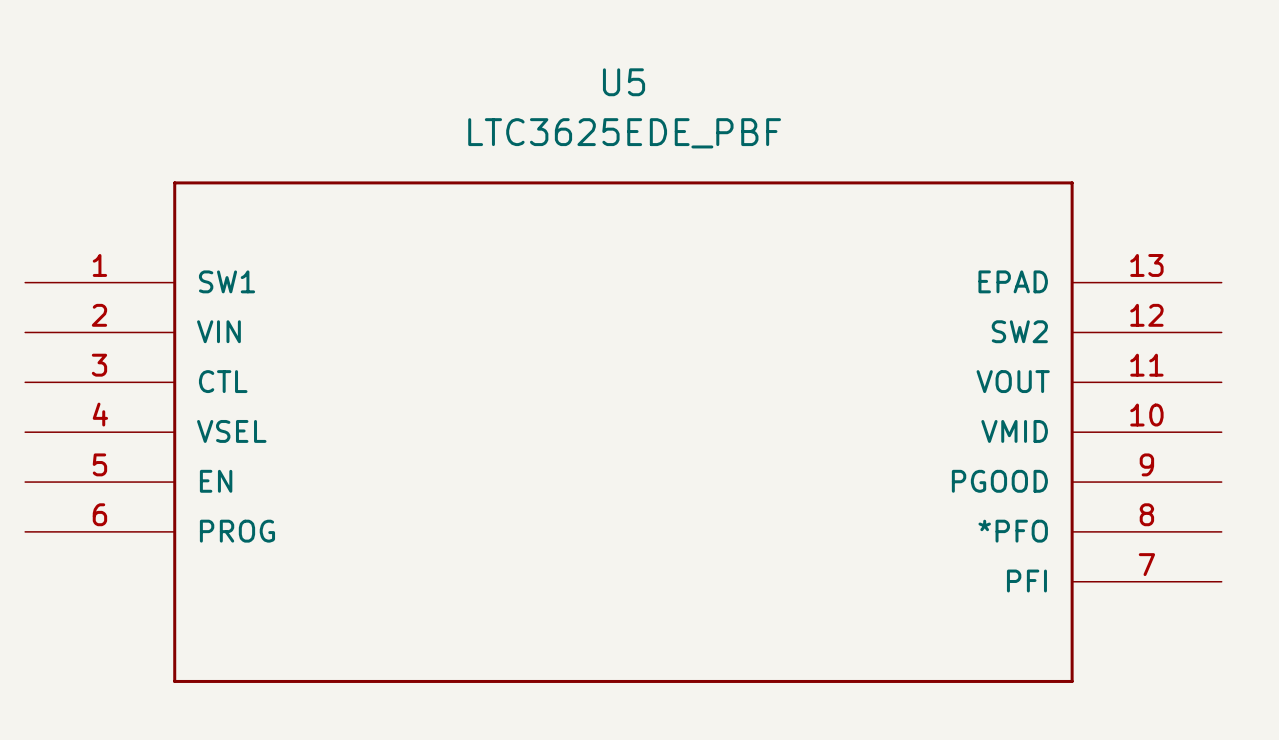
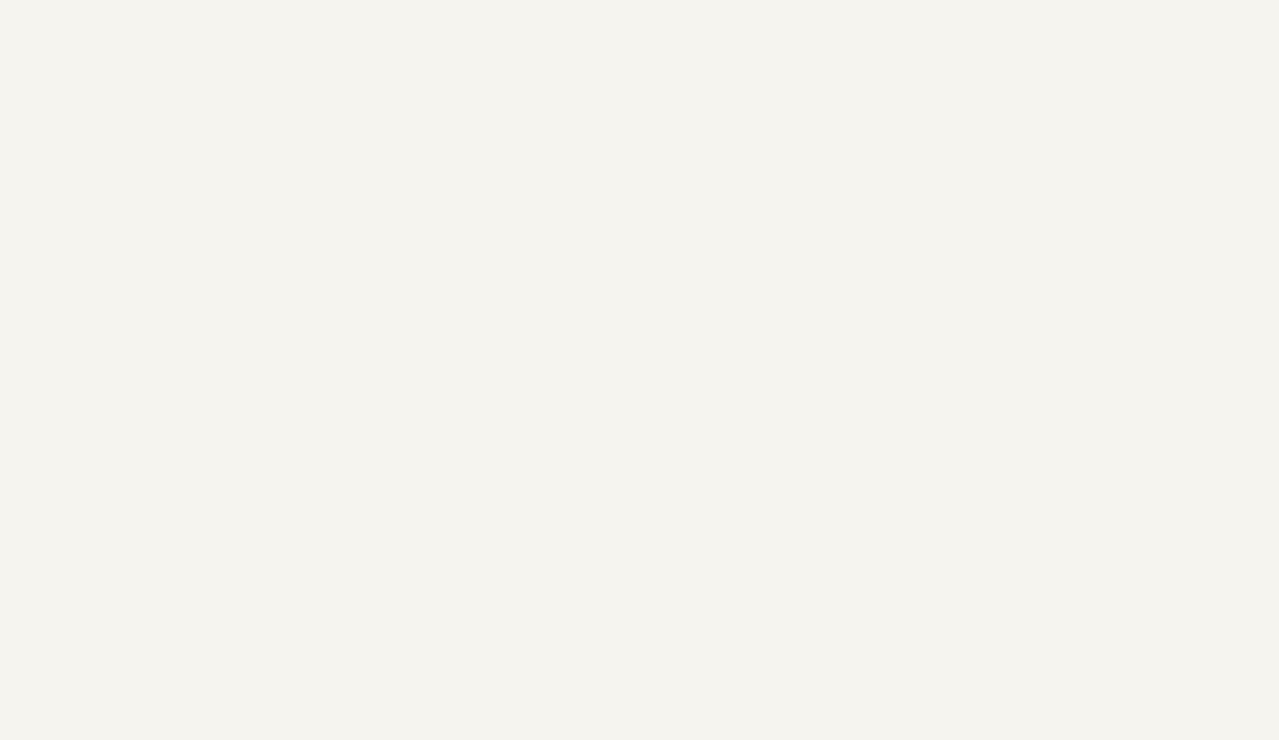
U5: LTC3625EDE_PBF (623, 432) -> none

